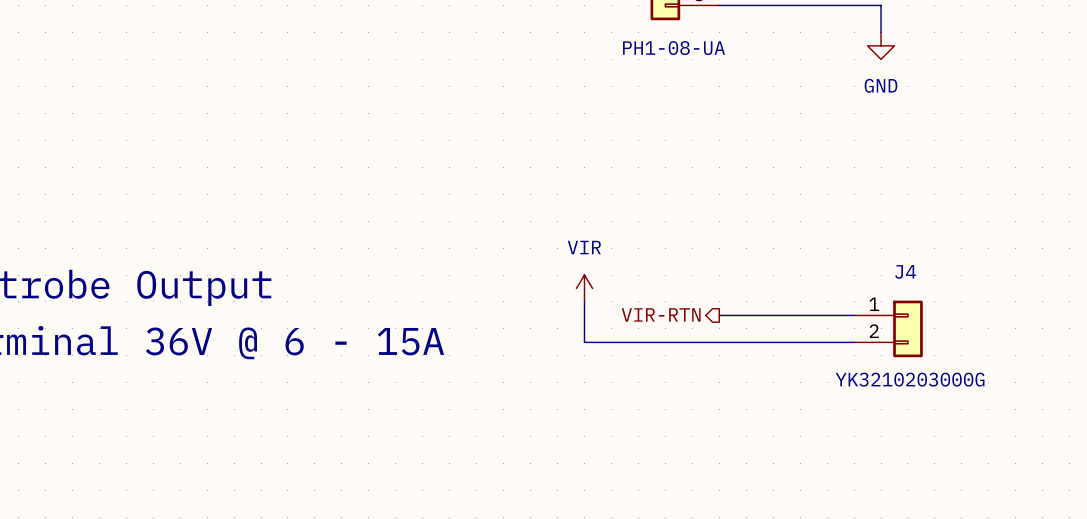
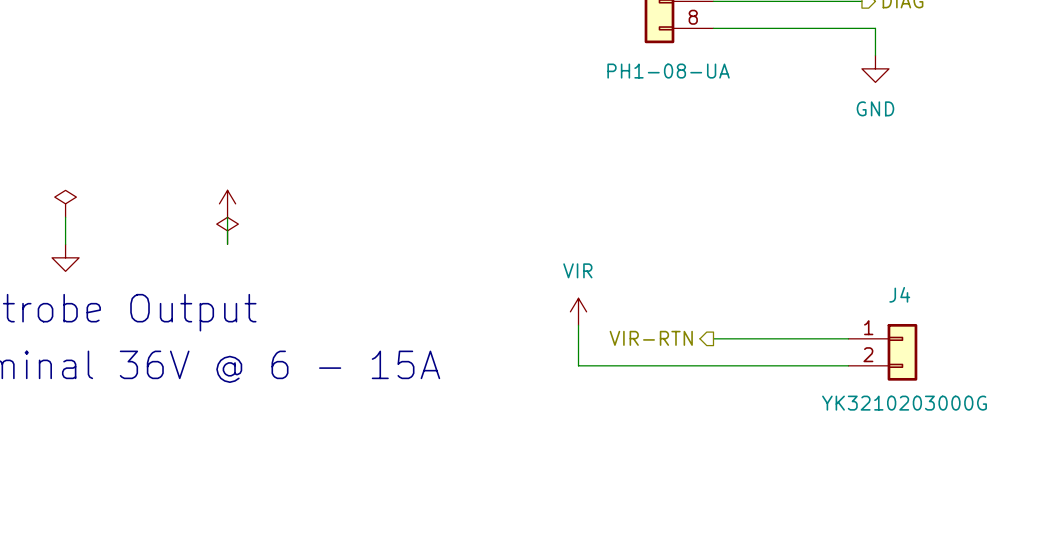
power symbol: none -> (65, 203)
power symbol: none -> (227, 203)
wire: none -> (65, 217) (65, 244)
wire: none -> (227, 217) (227, 244)
power symbol: none -> (227, 230)
power symbol: none -> (65, 257)

